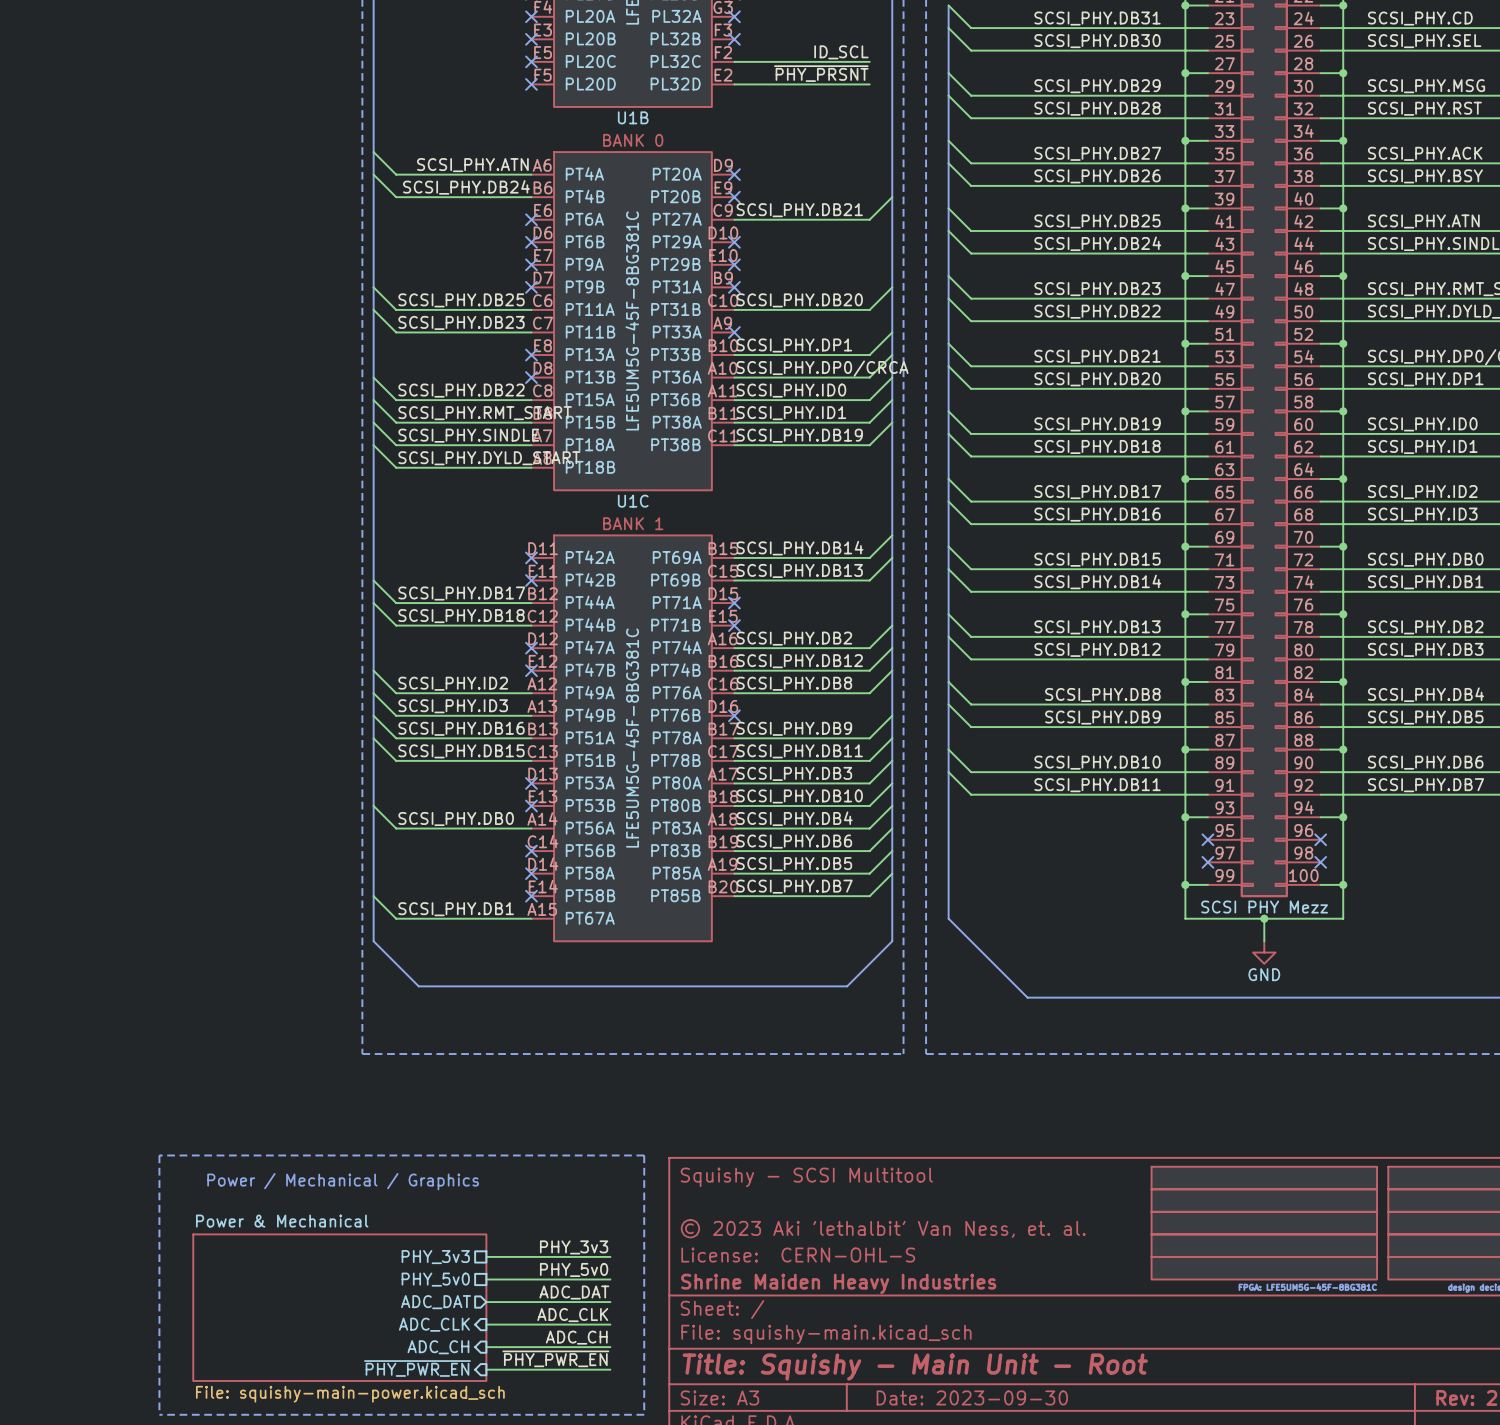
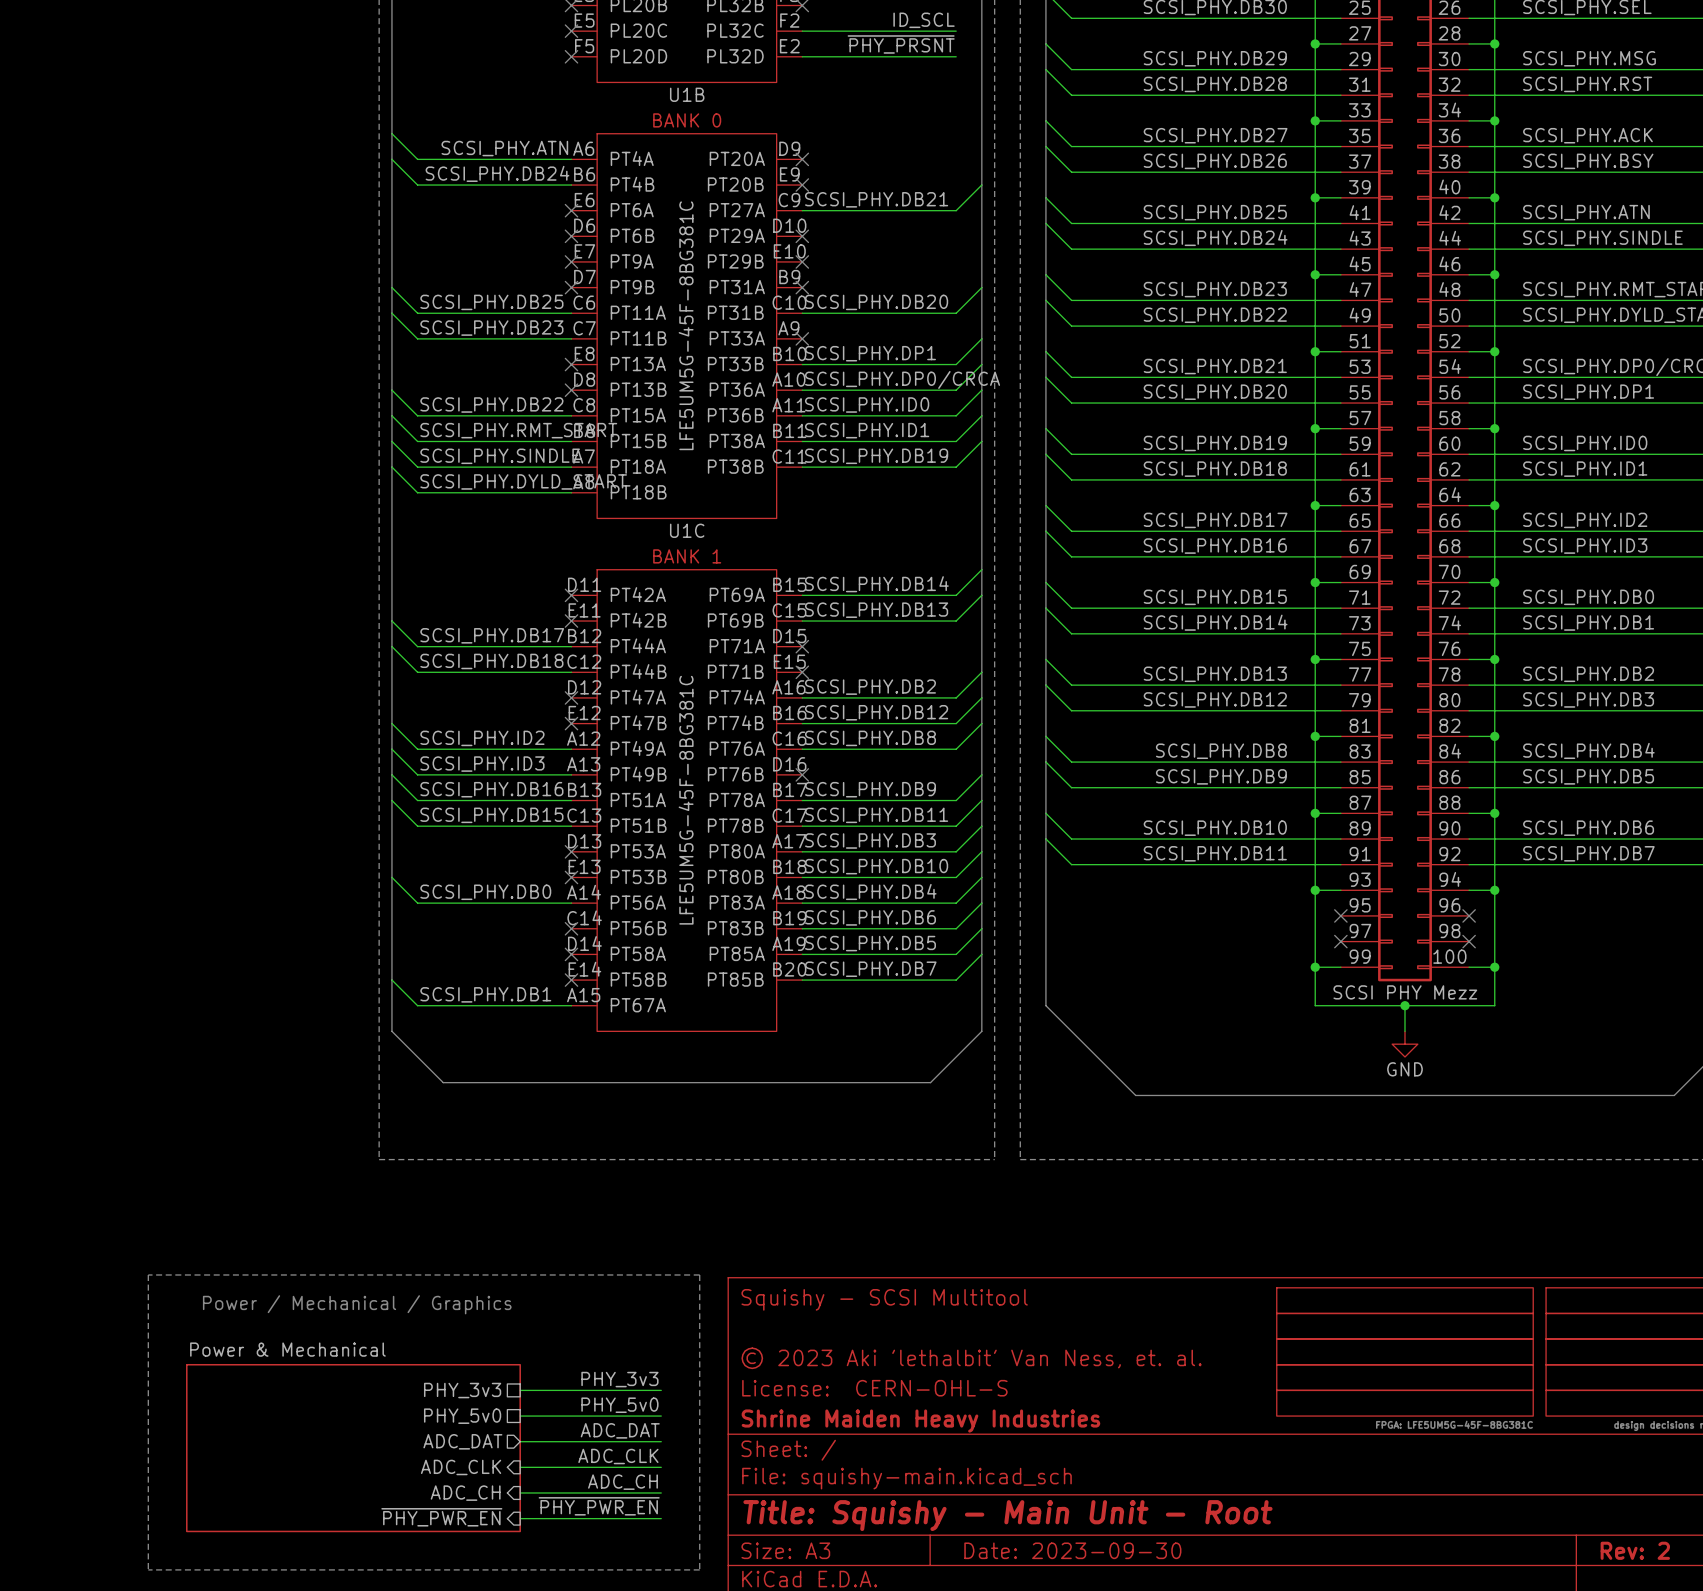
sheet Power & Mechanical value: File: squishy-main-power.kicad_sch (350, 1394) -> none

